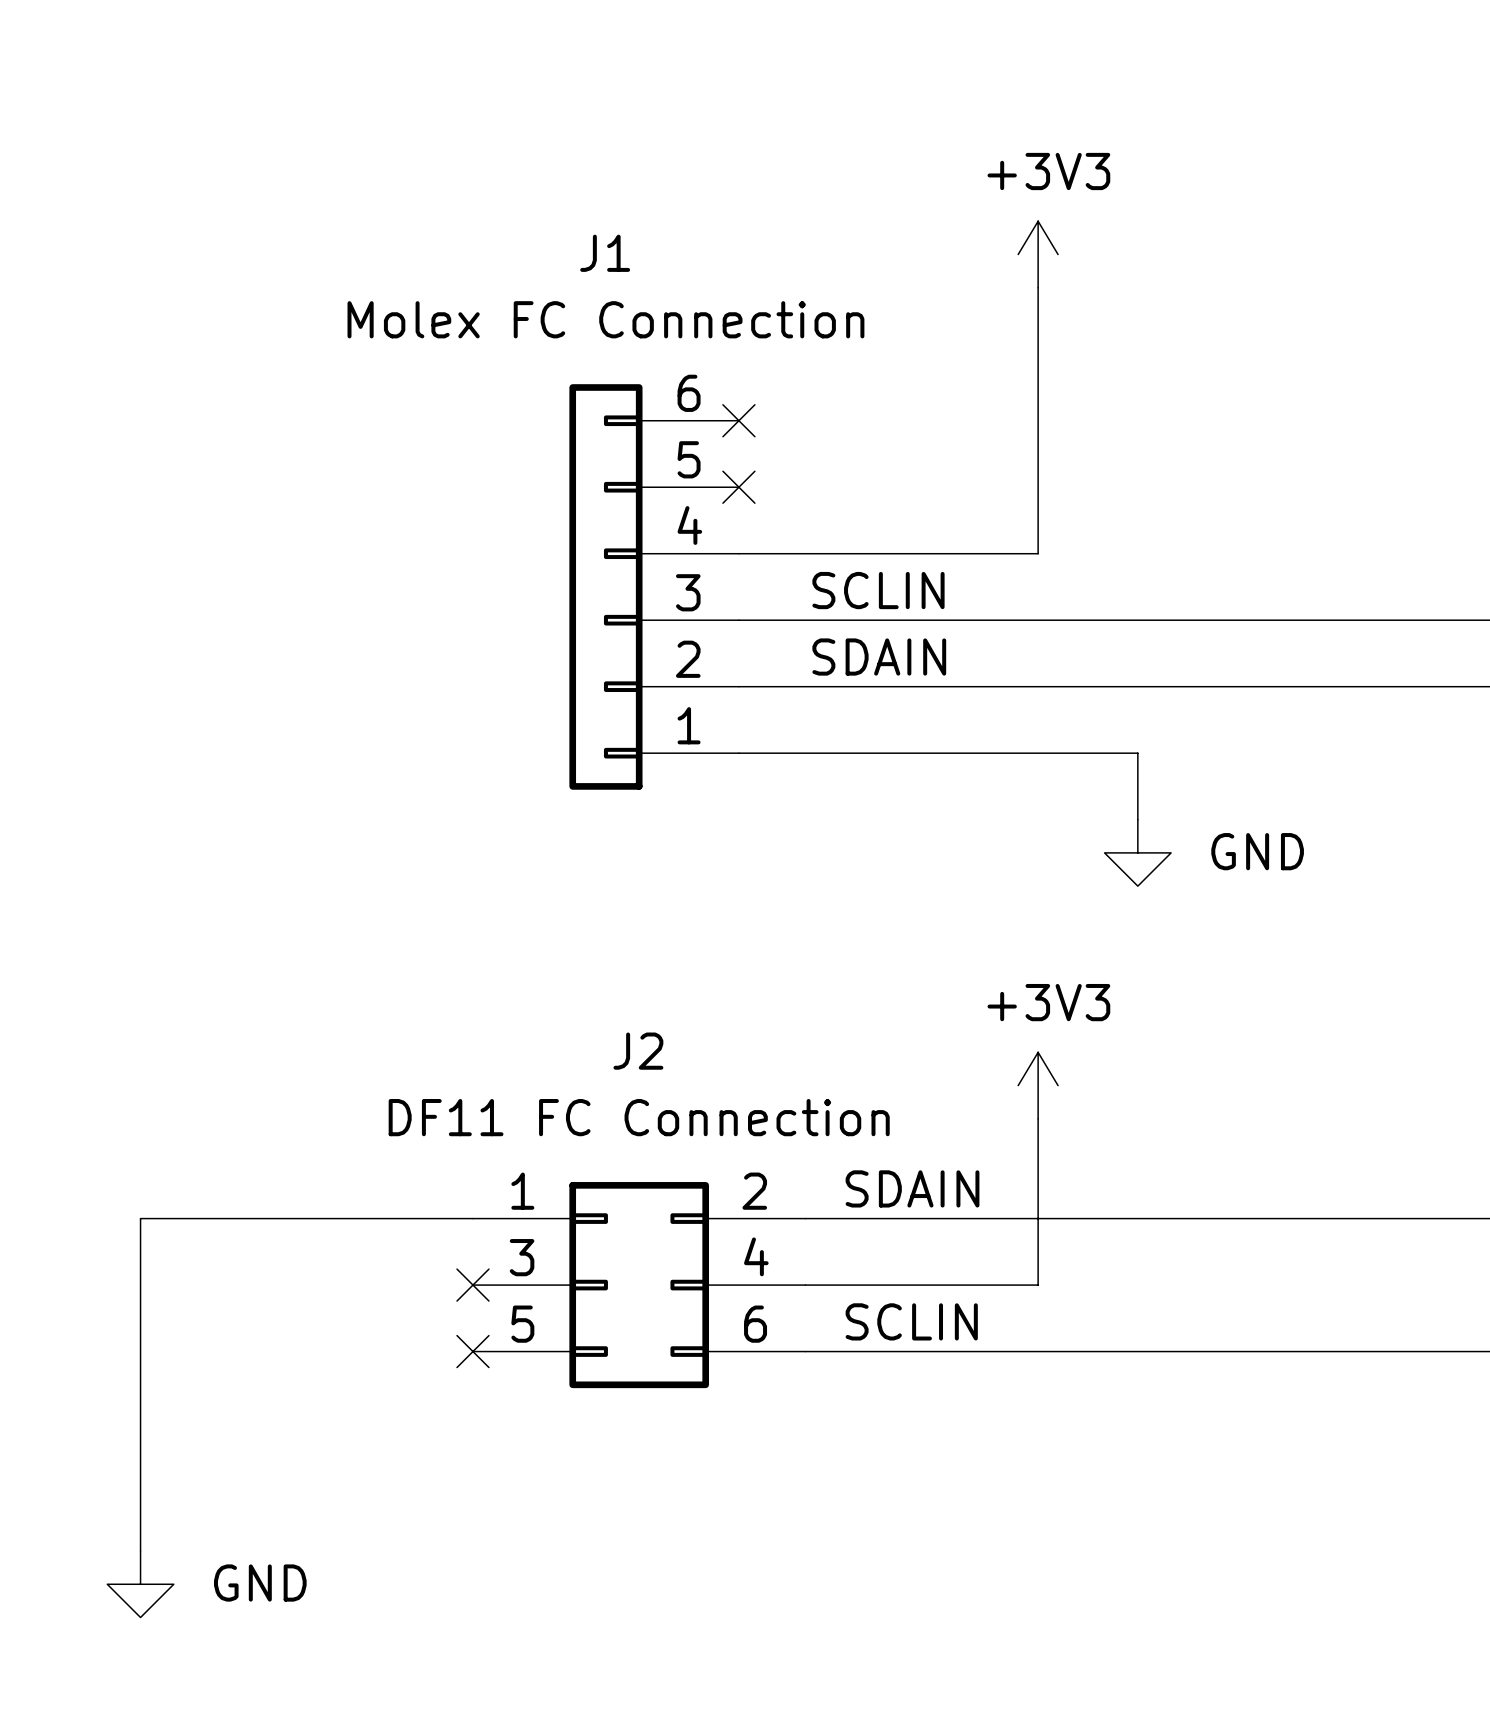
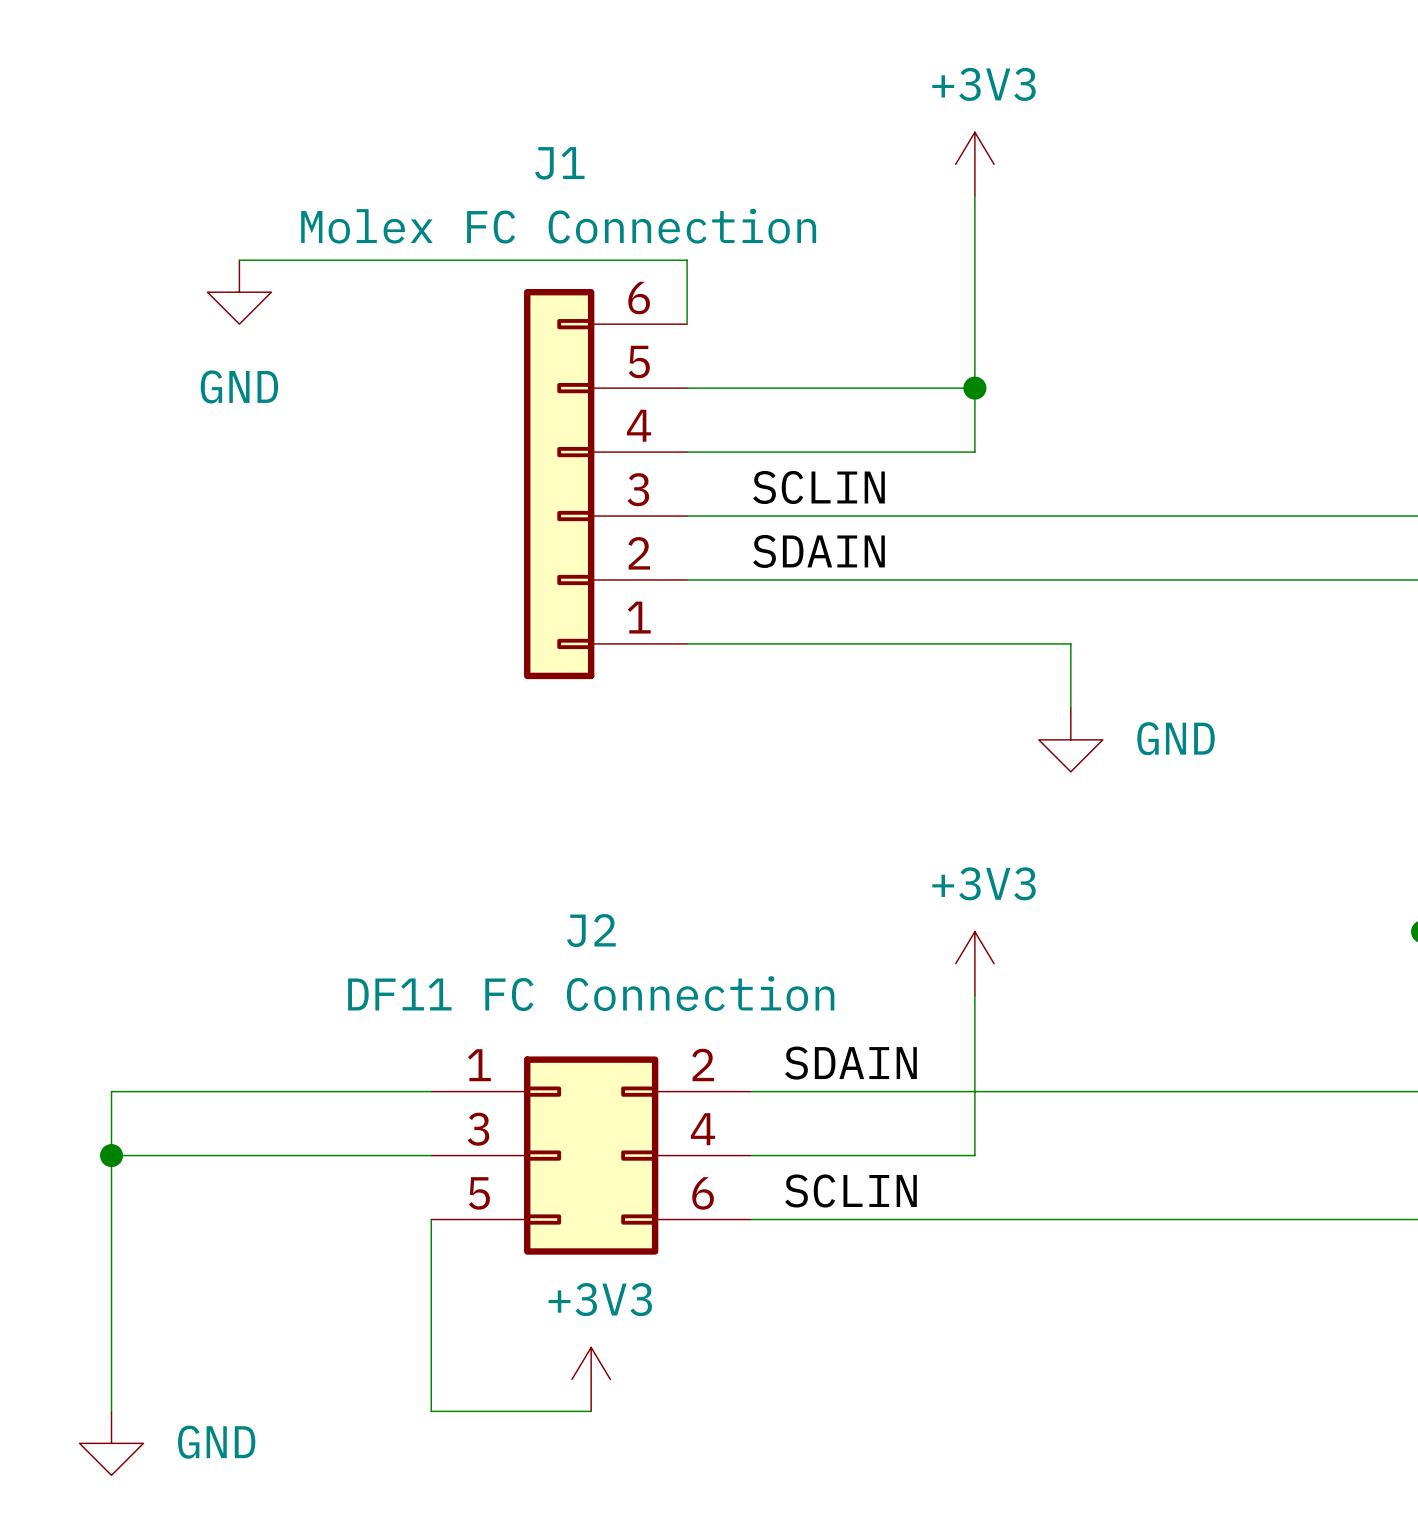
wire: none -> (239, 260) (687, 260) (687, 324)
power symbol: none -> GND (239, 292)
no-connect mark: (738, 420) -> none
wire: none -> (687, 388) (974, 388)
no-connect mark: (738, 487) -> none
junction: none -> (974, 388)
wire: none -> (111, 1155) (431, 1155)
junction: none -> (111, 1155)
no-connect mark: (472, 1285) -> none
wire: none -> (431, 1219) (431, 1411) (591, 1411)
no-connect mark: (472, 1351) -> none
power symbol: none -> +3V3 (591, 1379)

